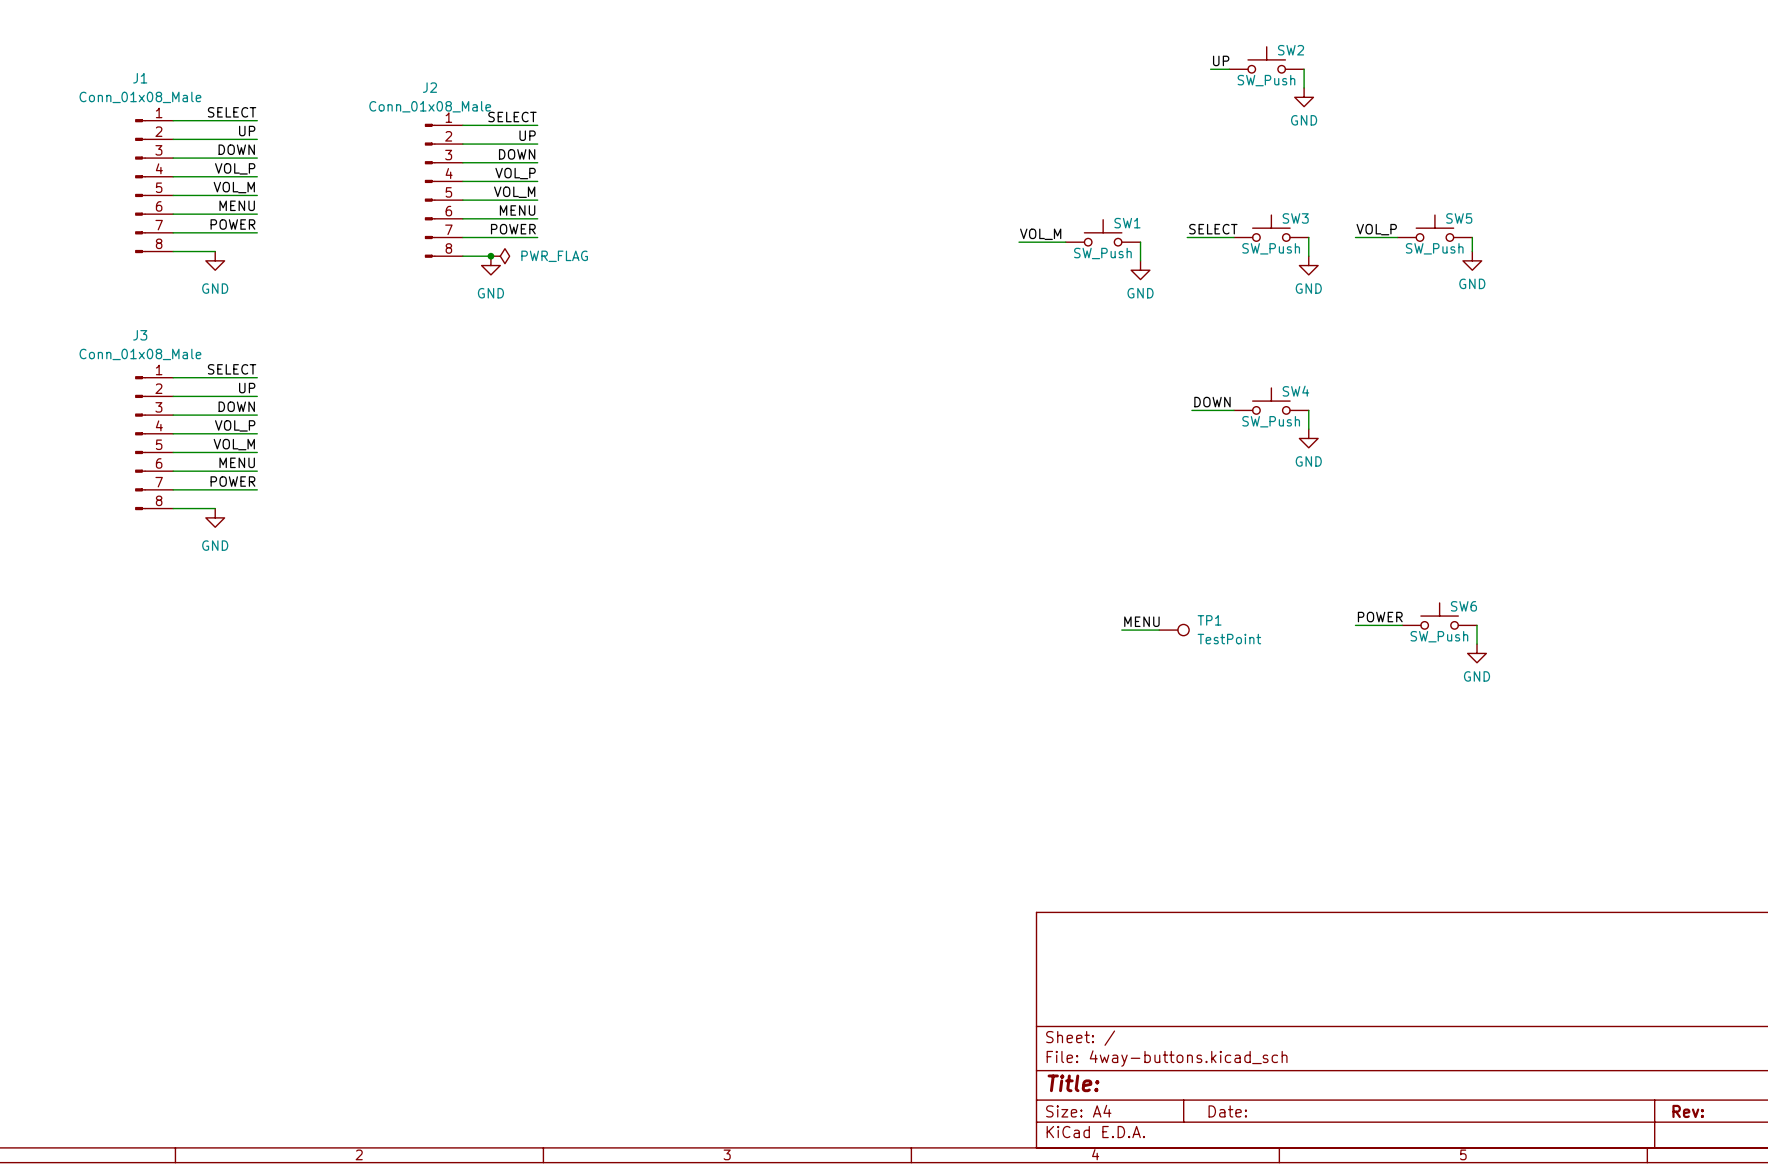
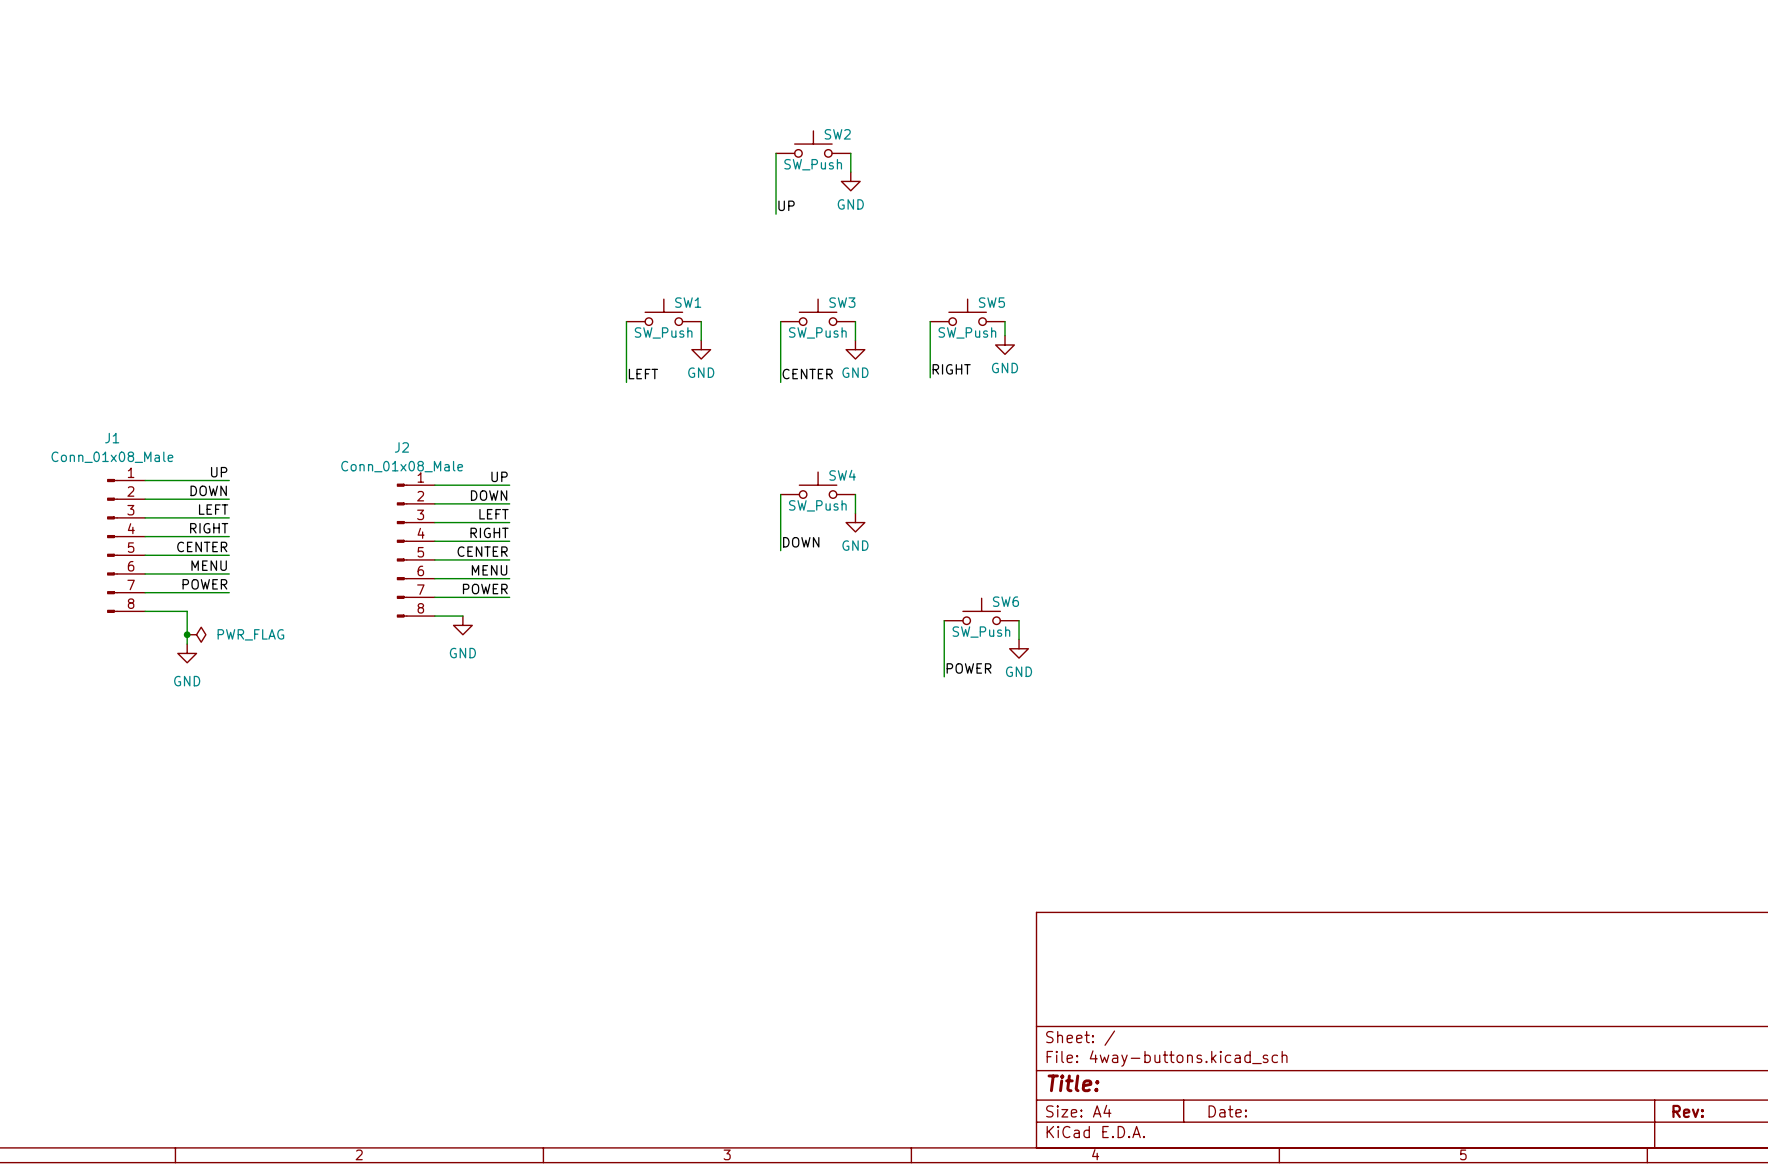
SW2 position: (1266, 59) -> (813, 144)
label: UP (1221, 60) -> none
wire: (1210, 69) (1229, 69) -> none
wire: (1304, 69) (1304, 87) -> none
power symbol: GND (1304, 97) -> none
label: SELECT (232, 112) -> none
label: SELECT (512, 117) -> none
wire: (173, 120) (257, 120) -> none
wire: (462, 125) (537, 125) -> none
label: UP (247, 131) -> none
label: UP (527, 135) -> none
wire: (173, 139) (257, 139) -> none
wire: (462, 144) (537, 144) -> none
label: DOWN (236, 149) -> none
wire: none -> (776, 153) (776, 214)
wire: none -> (850, 153) (850, 172)
label: DOWN (517, 154) -> none
wire: (173, 158) (257, 158) -> none
wire: (462, 162) (537, 162) -> none
label: VOL_P (235, 168) -> none
label: VOL_P (515, 173) -> none
wire: (173, 176) (257, 176) -> none
wire: (462, 181) (537, 181) -> none
power symbol: none -> GND (850, 181)
J1 position: (154, 186) -> (126, 545)
label: VOL_M (234, 187) -> none
J2 position: (443, 190) -> (415, 550)
label: VOL_M (514, 192) -> none
wire: (173, 195) (257, 195) -> none
wire: (462, 200) (537, 200) -> none
label: MENU (237, 205) -> none
label: none -> UP (786, 205)
label: MENU (517, 210) -> none
wire: (173, 214) (257, 214) -> none
wire: (462, 218) (537, 218) -> none
label: POWER (232, 224) -> none
SW3 position: (1271, 228) -> (818, 312)
SW5 position: (1434, 228) -> (967, 312)
label: POWER (513, 229) -> none
label: SELECT (1213, 229) -> none
label: VOL_P (1376, 229) -> none
wire: (173, 232) (257, 232) -> none
SW1 position: (1103, 232) -> (663, 312)
label: VOL_M (1040, 234) -> none
wire: (462, 237) (537, 237) -> none
wire: (1187, 237) (1233, 237) -> none
wire: (1308, 237) (1308, 256) -> none
wire: (1355, 237) (1397, 237) -> none
wire: (1472, 237) (1472, 251) -> none
wire: (1019, 242) (1065, 242) -> none
wire: (1140, 242) (1140, 260) -> none
wire: (173, 251) (215, 251) -> none
wire: (462, 256) (490, 256) -> none
junction: (490, 256) -> none
power symbol: PWR_FLAG (500, 256) -> none
power symbol: GND (215, 260) -> none
power symbol: GND (1472, 260) -> none
power symbol: GND (490, 265) -> none
power symbol: GND (1308, 265) -> none
power symbol: GND (1140, 270) -> none
wire: none -> (626, 321) (626, 382)
wire: none -> (701, 321) (701, 340)
wire: none -> (780, 321) (780, 382)
wire: none -> (855, 321) (855, 340)
wire: none -> (930, 321) (930, 377)
wire: none -> (1005, 321) (1005, 335)
power symbol: none -> GND (1005, 344)
power symbol: none -> GND (701, 349)
power symbol: none -> GND (855, 349)
label: SELECT (232, 369) -> none
label: none -> RIGHT (951, 369)
label: none -> LEFT (643, 374)
label: none -> CENTER (807, 374)
wire: (173, 377) (257, 377) -> (145, 480) (229, 480)
label position: UP (247, 388) -> UP (219, 472)
wire: (173, 396) (257, 396) -> (145, 499) (229, 499)
SW4 position: (1271, 401) -> (818, 485)
label: DOWN (1212, 402) -> none
label position: DOWN (236, 406) -> DOWN (208, 490)
wire: (1191, 410) (1233, 410) -> none
wire: (1308, 410) (1308, 429) -> none
wire: (173, 415) (257, 415) -> (145, 517) (229, 517)
label: VOL_P (235, 425) -> none
wire: (173, 433) (257, 433) -> (145, 536) (229, 536)
power symbol: GND (1308, 438) -> none
J3: Conn_01x08_Male (154, 443) -> none
label: VOL_M (234, 444) -> none
wire: (173, 452) (257, 452) -> (145, 555) (229, 555)
label position: MENU (237, 462) -> MENU (209, 565)
wire: (173, 471) (257, 471) -> (145, 573) (229, 573)
label: none -> UP (499, 476)
label position: POWER (232, 481) -> POWER (204, 584)
wire: none -> (434, 485) (509, 485)
wire: (173, 489) (257, 489) -> (145, 592) (229, 592)
wire: none -> (780, 494) (780, 550)
wire: none -> (855, 494) (855, 513)
label: none -> DOWN (489, 495)
wire: none -> (434, 503) (509, 503)
wire: (173, 508) (215, 508) -> none
label: none -> LEFT (213, 509)
label: none -> LEFT (493, 514)
power symbol: GND (215, 517) -> none
wire: none -> (434, 522) (509, 522)
power symbol: none -> GND (855, 522)
label: none -> RIGHT (209, 528)
label: none -> RIGHT (489, 532)
wire: none -> (434, 541) (509, 541)
label: none -> DOWN (801, 542)
label: none -> CENTER (202, 546)
label: none -> CENTER (482, 551)
wire: none -> (434, 559) (509, 559)
label: none -> MENU (489, 570)
wire: none -> (434, 578) (509, 578)
label: none -> POWER (485, 589)
wire: none -> (434, 597) (509, 597)
wire: none -> (145, 611) (187, 611) (187, 644)
wire: none -> (434, 616) (462, 616)
SW6 position: (1439, 616) -> (981, 611)
label: POWER (1380, 617) -> none
wire: none -> (944, 620) (944, 676)
wire: none -> (1019, 620) (1019, 639)
label: MENU (1141, 621) -> none
power symbol: none -> GND (462, 625)
wire: (1355, 625) (1402, 625) -> none
wire: (1477, 625) (1477, 644) -> none
wire: (1121, 630) (1159, 630) -> none
TP1: TestPoint (1174, 630) -> none
junction: none -> (187, 634)
power symbol: none -> PWR_FLAG (196, 634)
power symbol: none -> GND (1019, 648)
power symbol: none -> GND (187, 653)
power symbol: GND (1477, 653) -> none
label: none -> POWER (969, 668)

